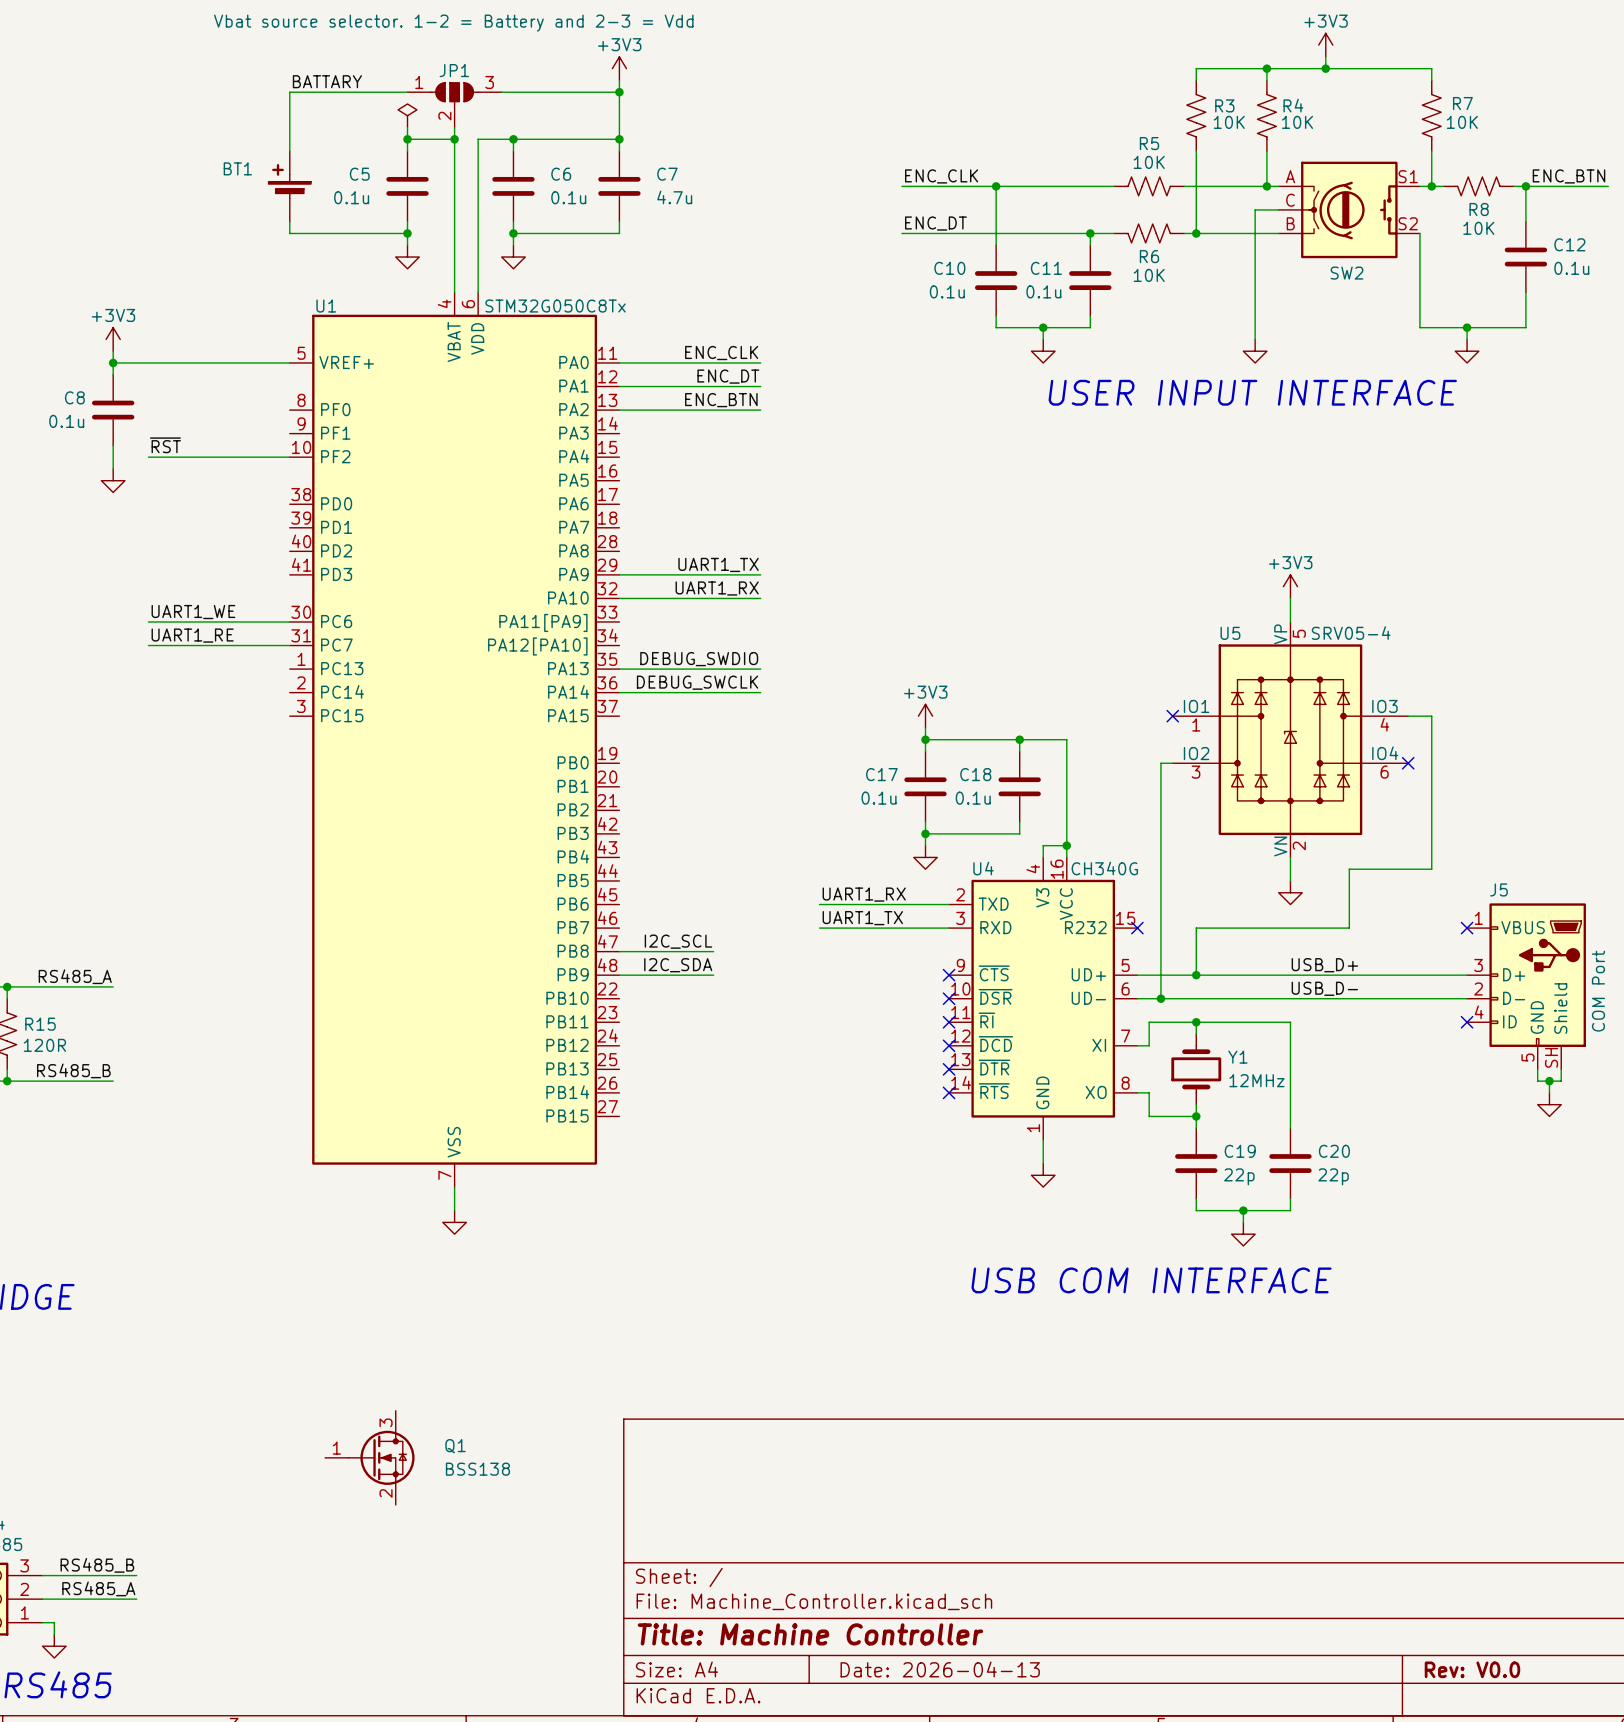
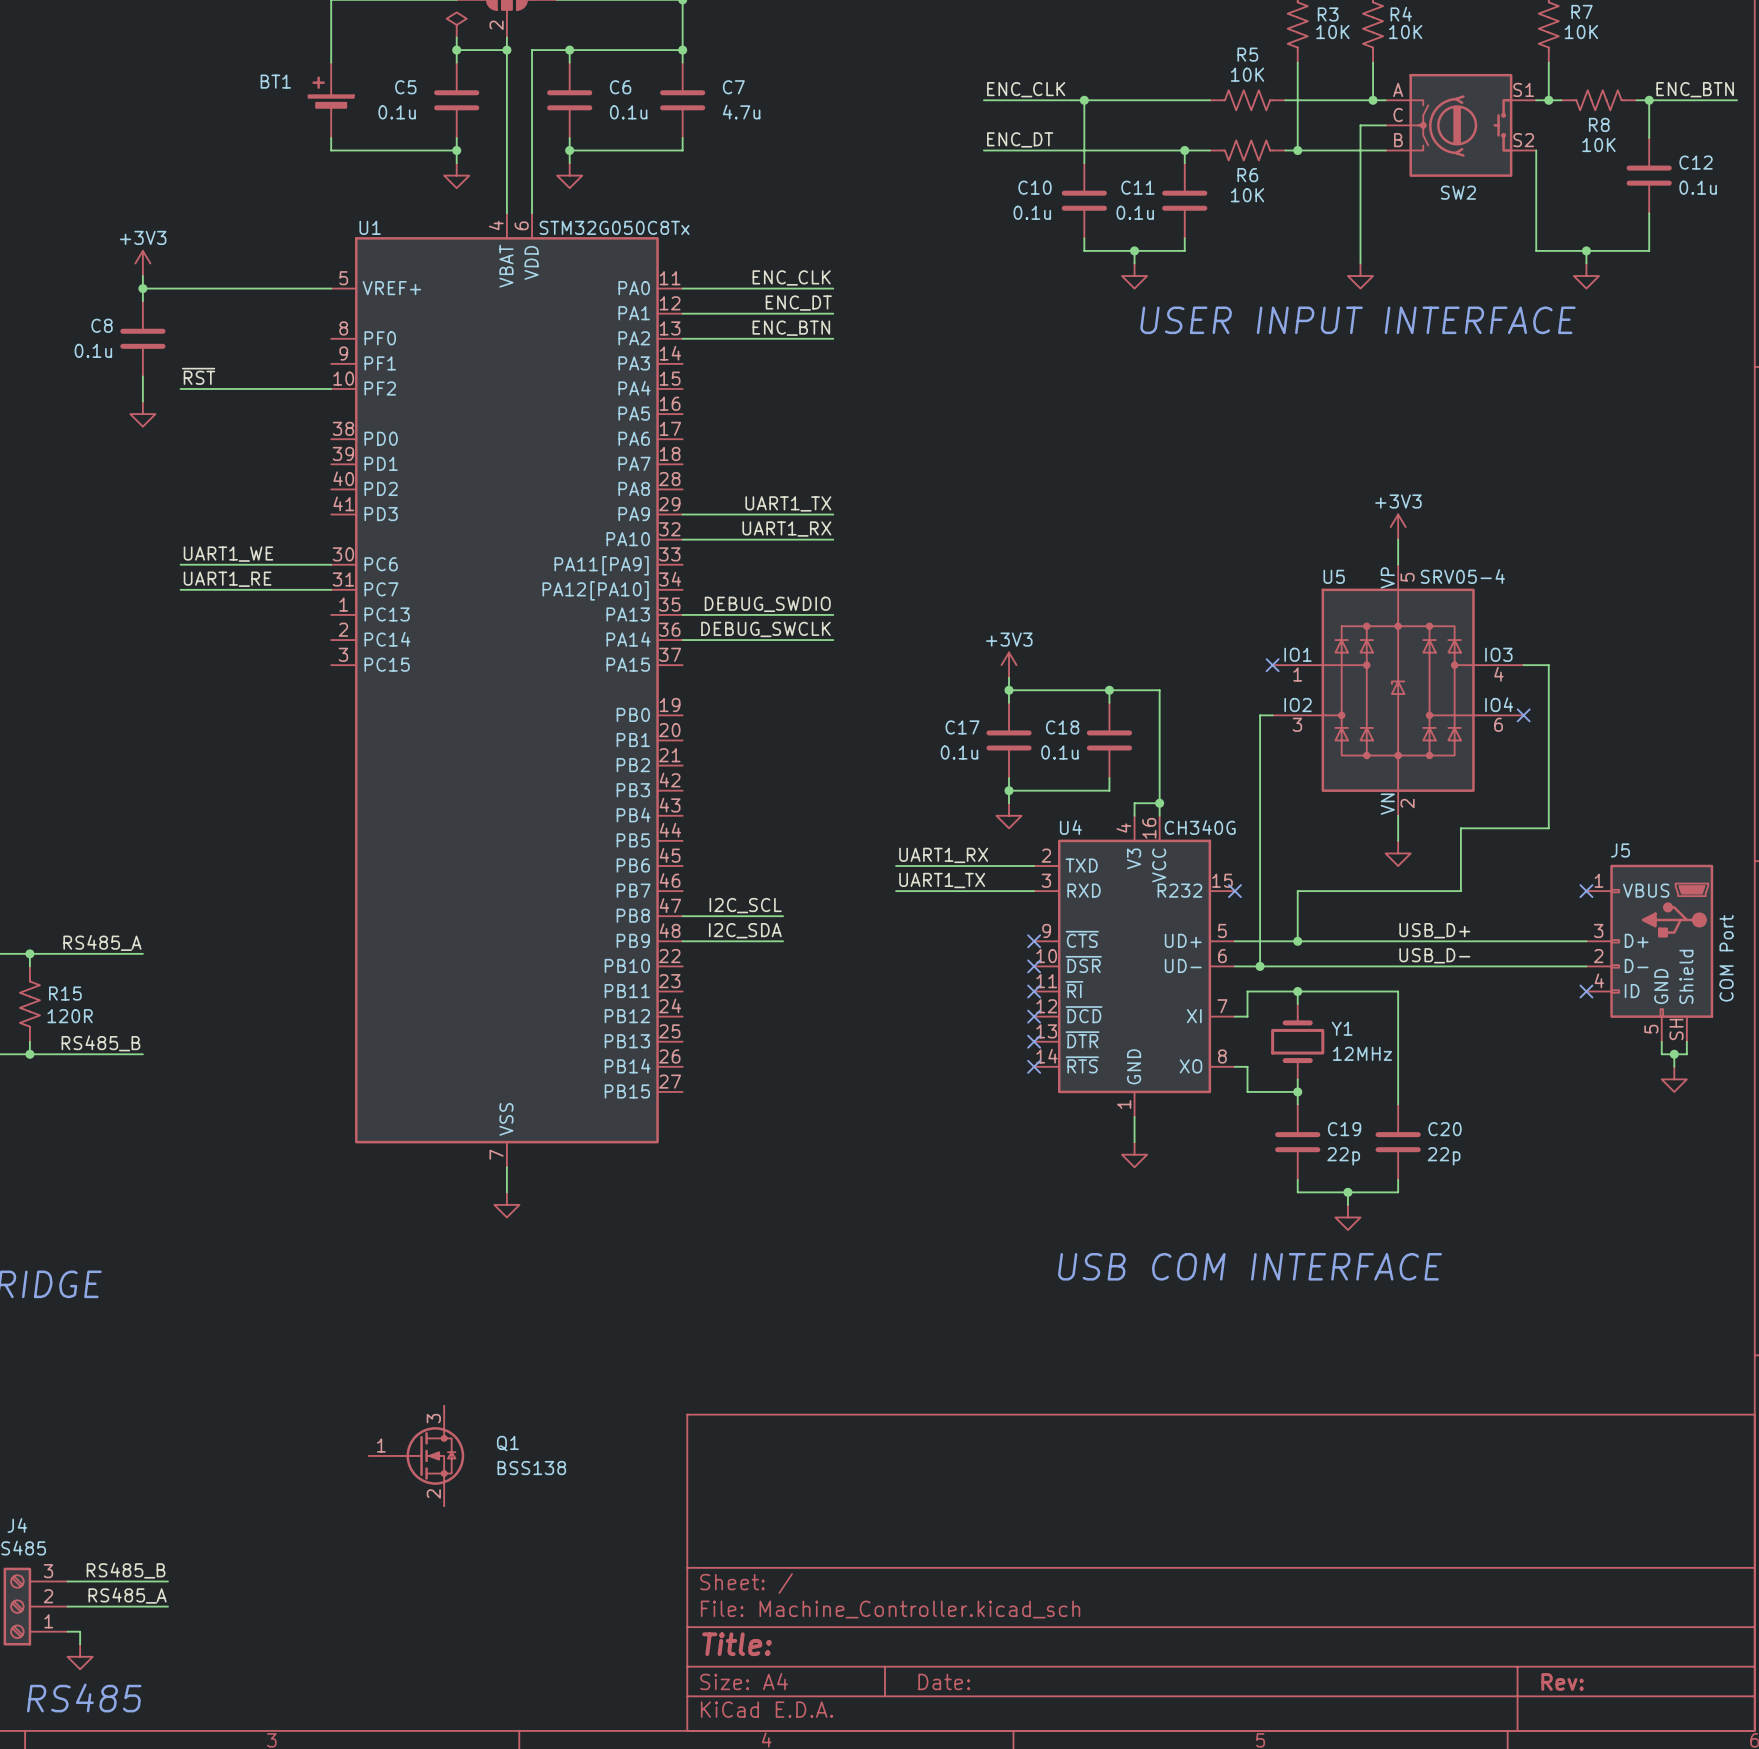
title block: Title: Machine Controller (810, 1634) -> Title: (737, 1644)
title block: Date: 2026-04-13 (940, 1669) -> Date: (944, 1681)
title block: Rev: V0.0 (1472, 1669) -> Rev: (1562, 1681)

